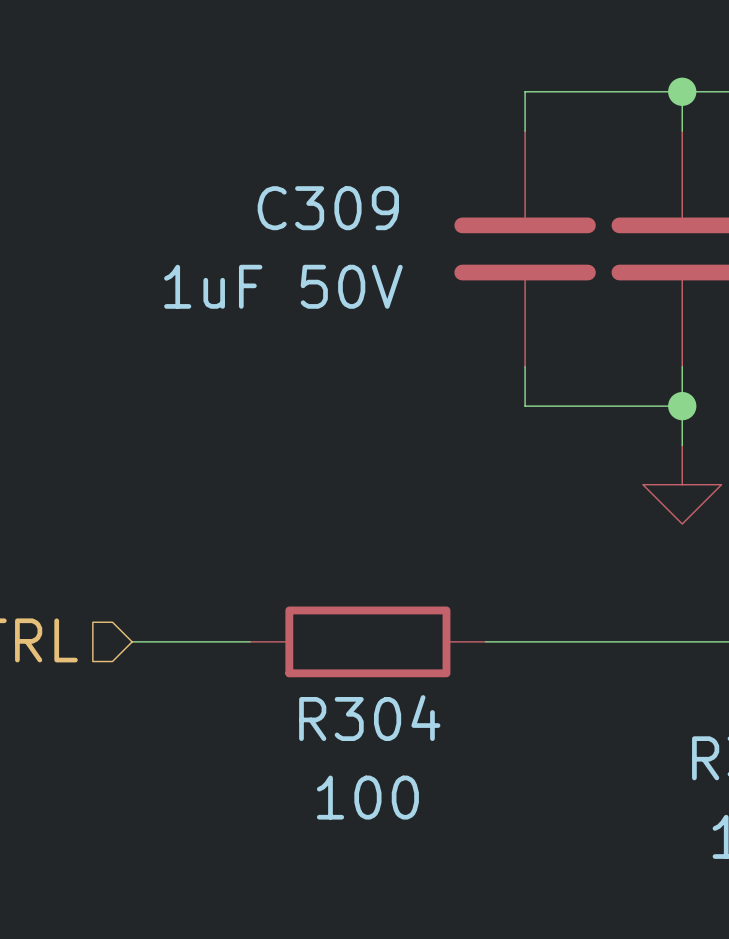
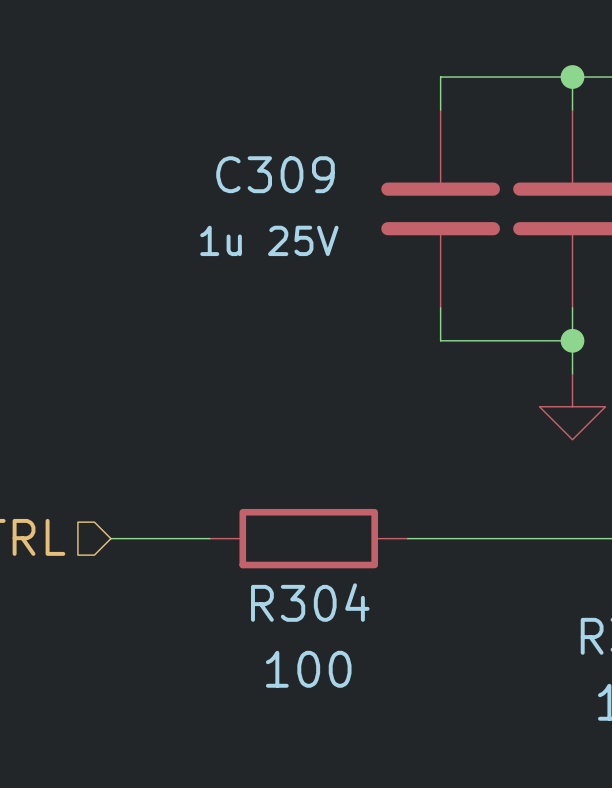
C309 value: 1uF 50V (283, 286) -> 1u 25V (269, 240)

